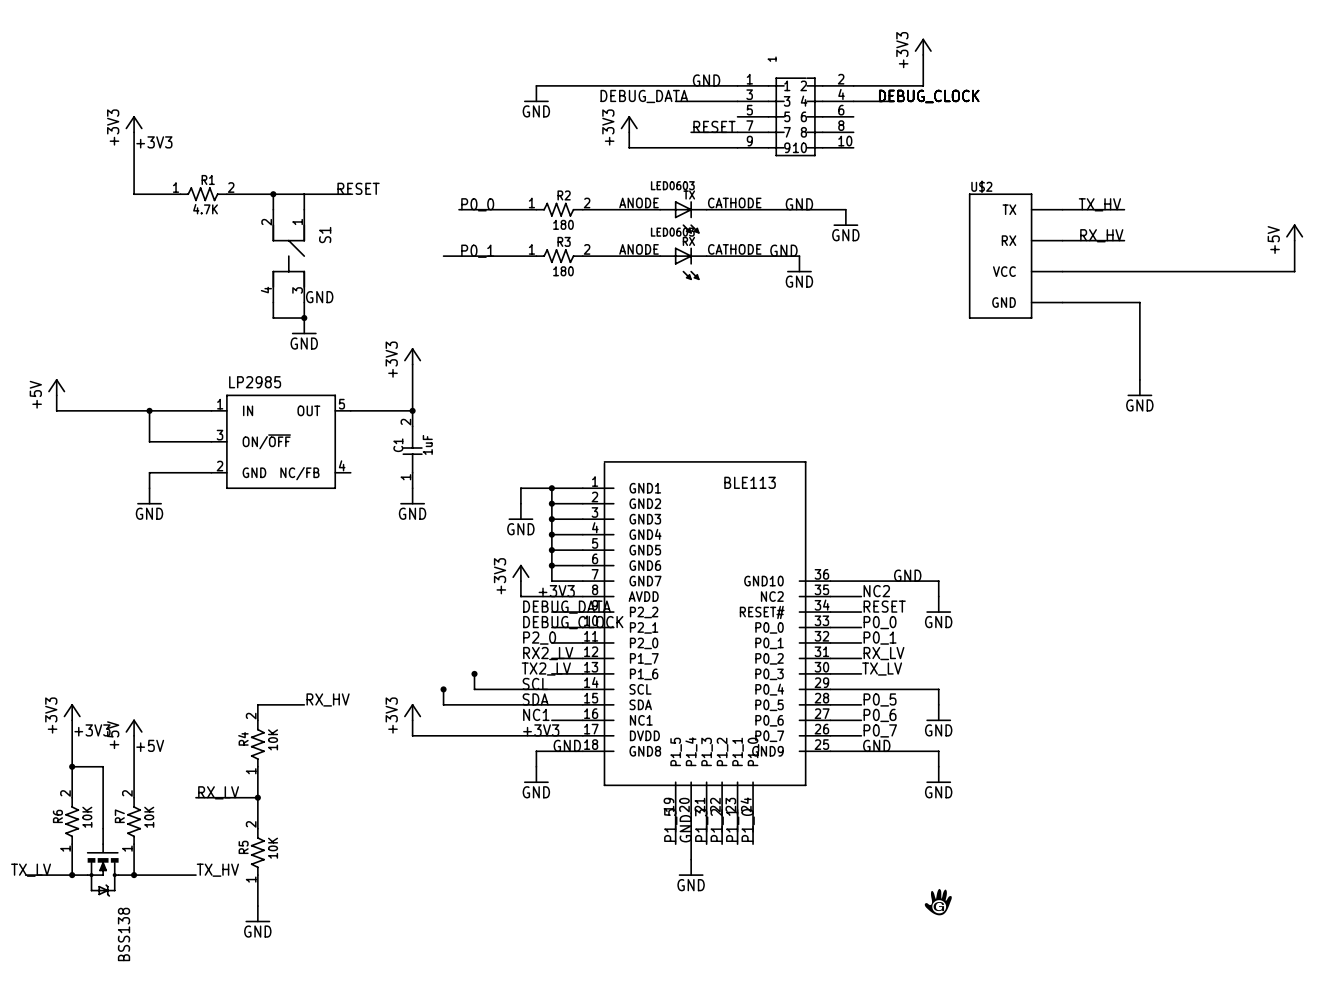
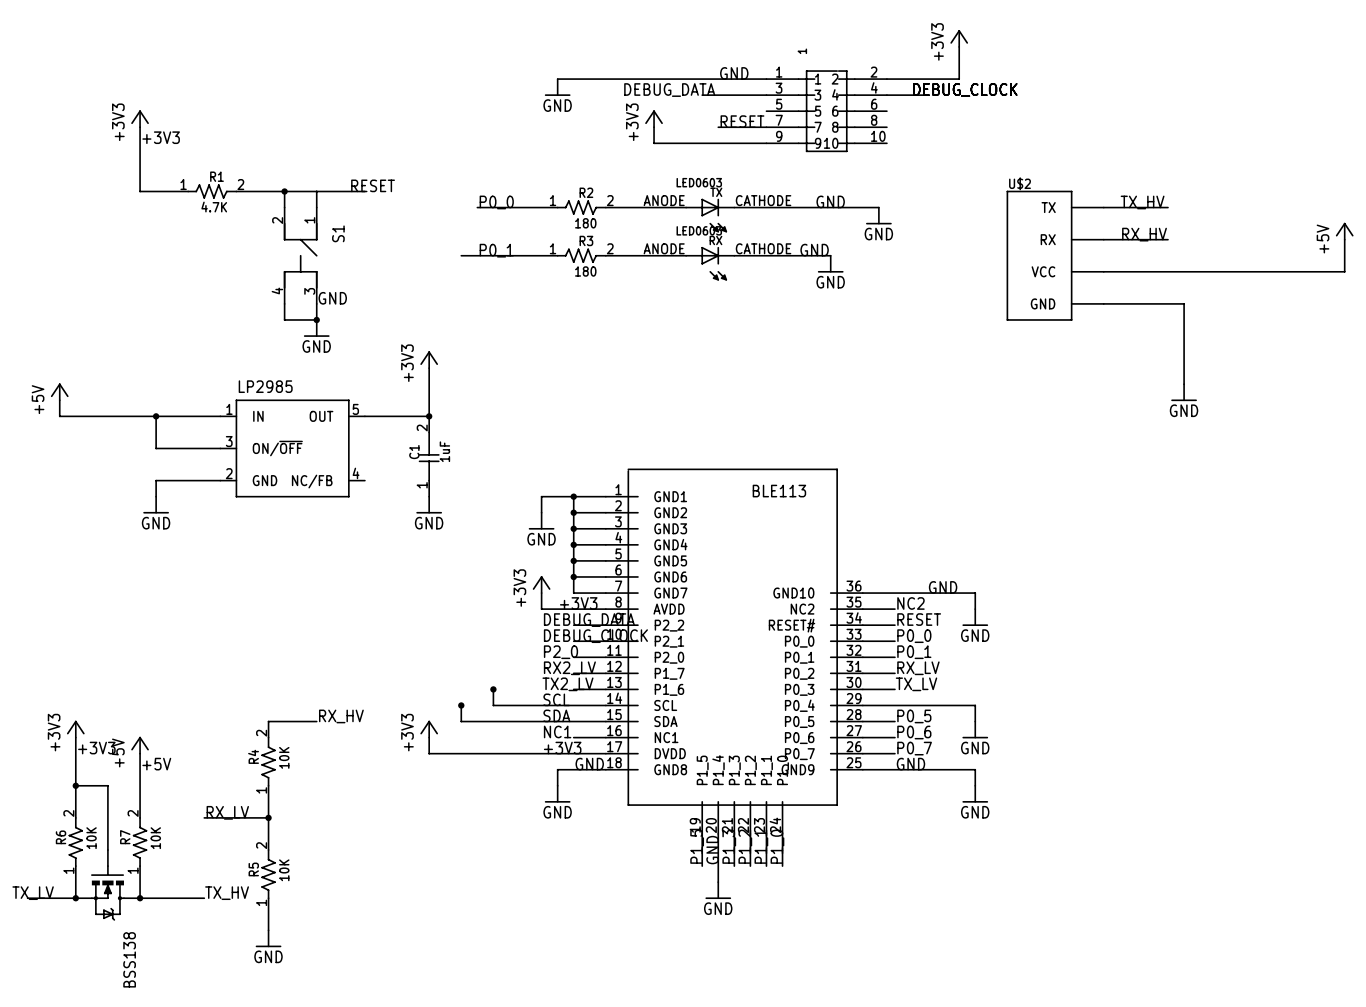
part: (938, 902) -> none

